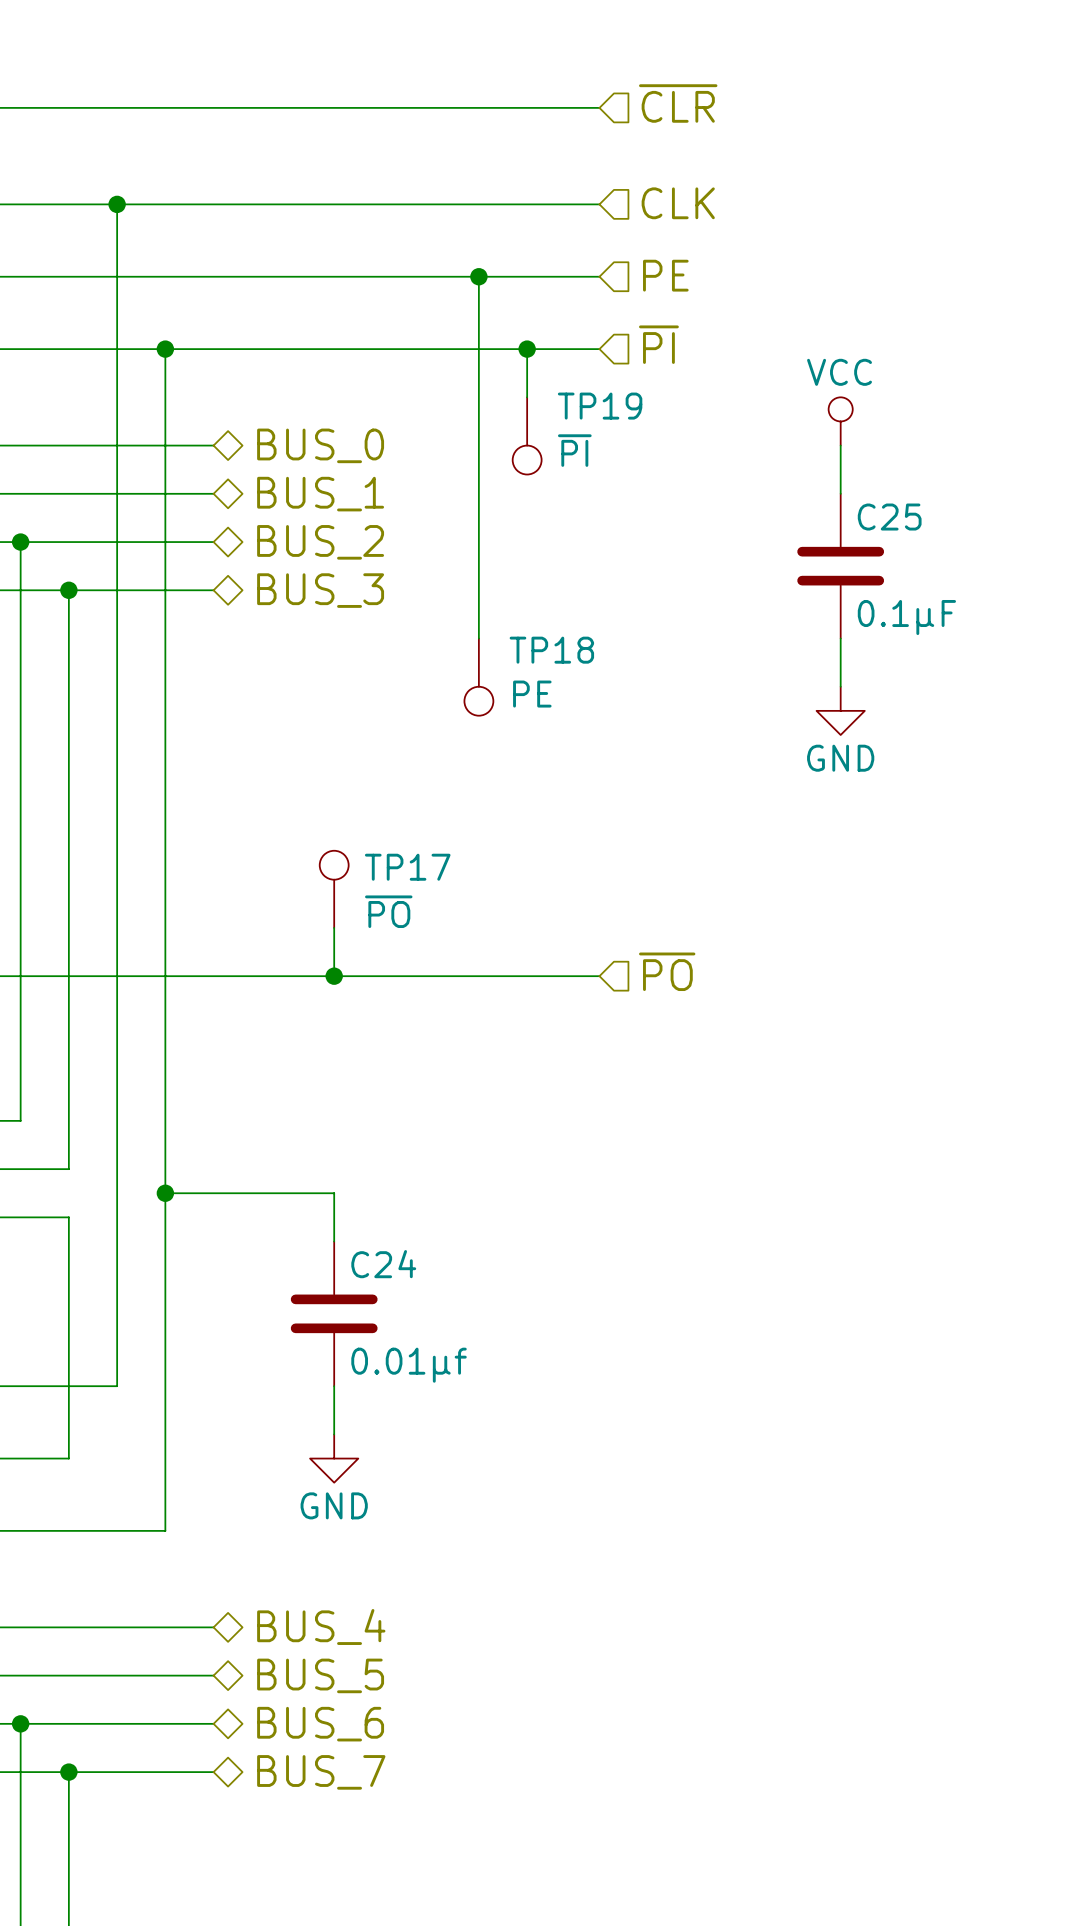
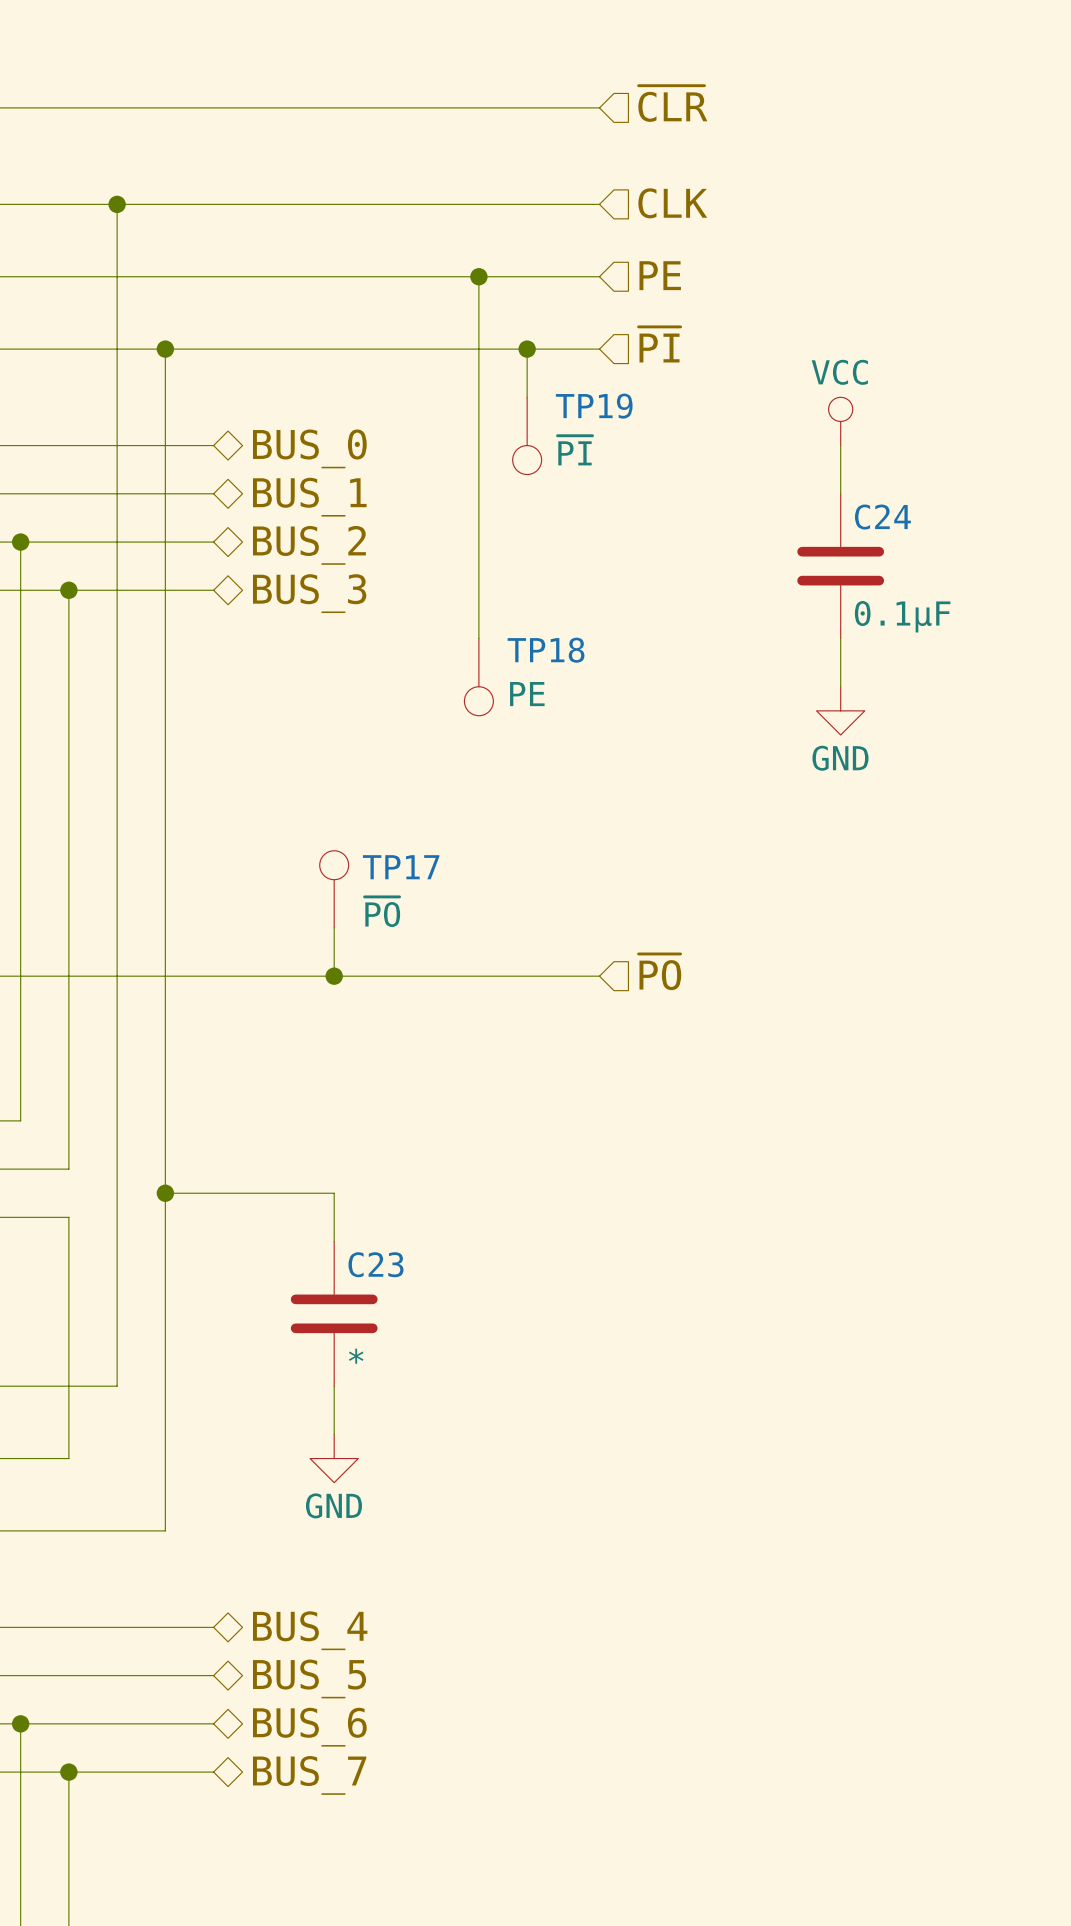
C25 name: C25 (889, 517) -> C24 (882, 517)
C24 name: C24 (383, 1264) -> C23 (376, 1264)
C24 value: 0.01µf (409, 1365) -> * (356, 1356)

